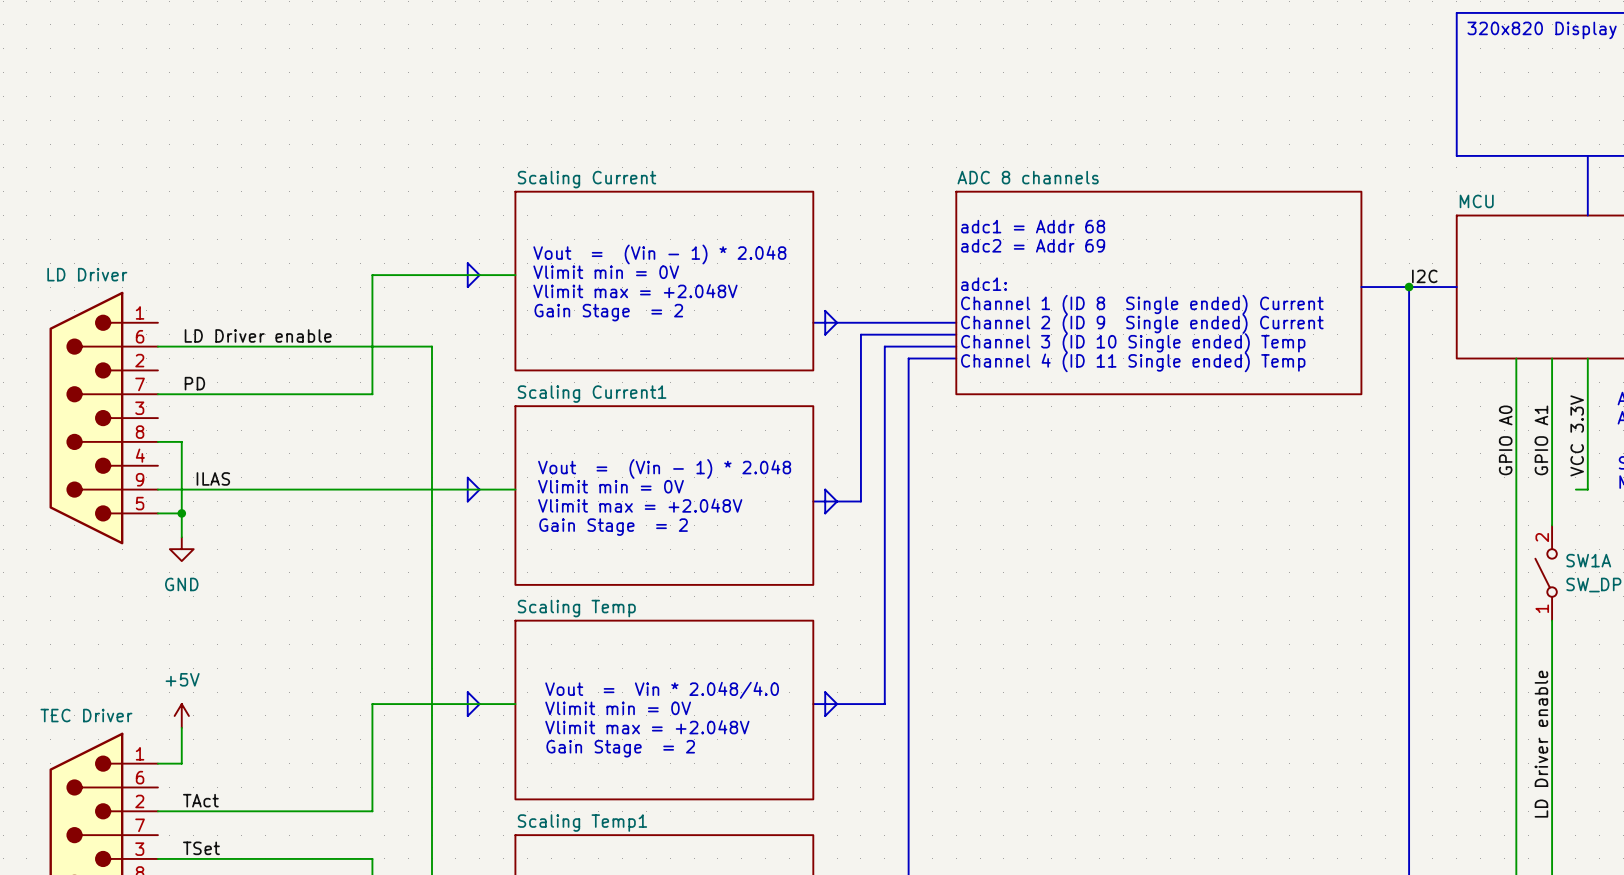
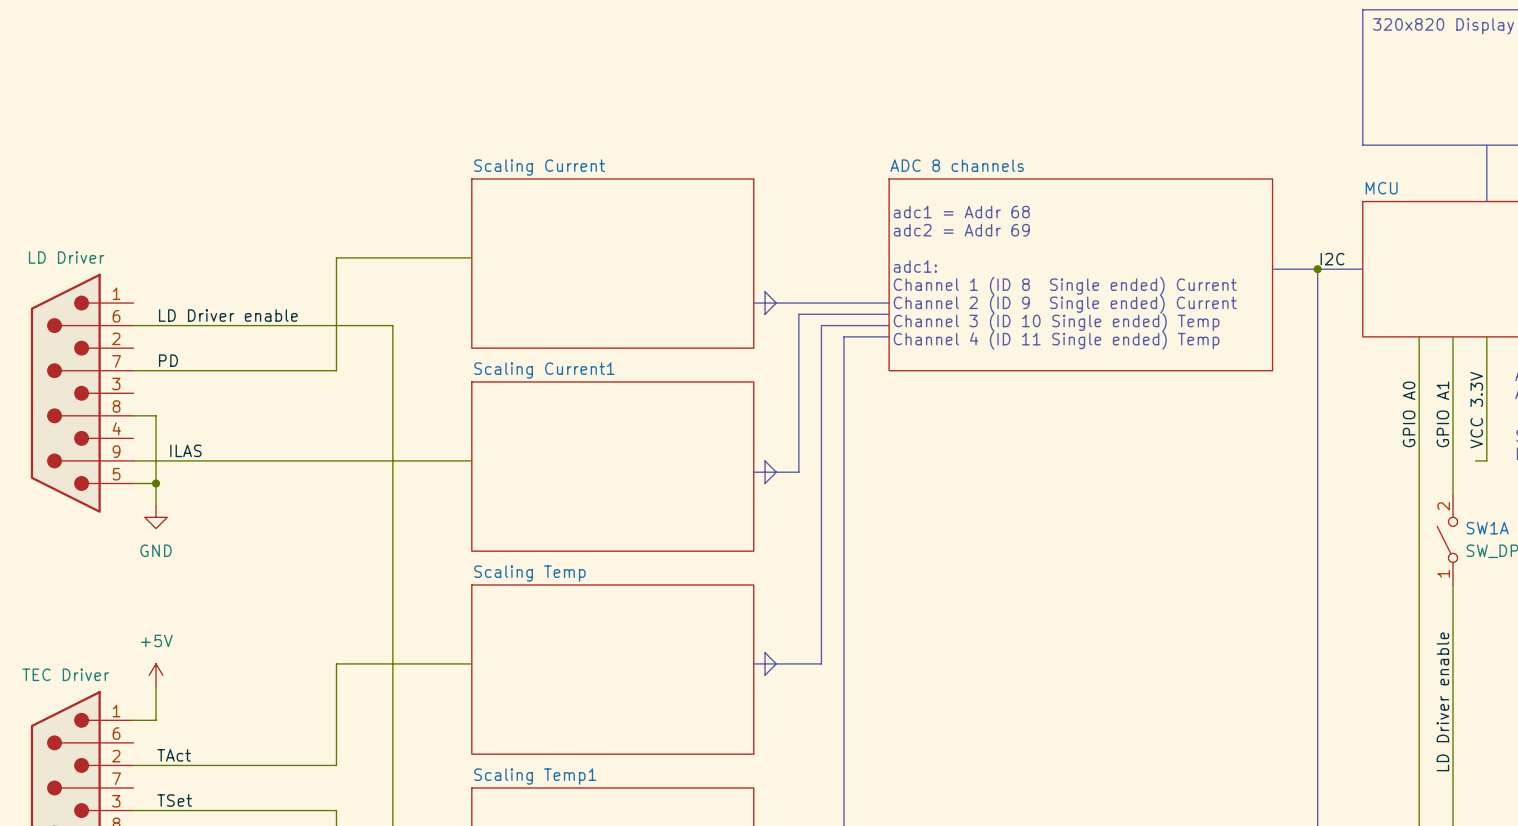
text: Vout = (Vin - 1) * 2.048 (659, 254) -> none
line: (467, 263) (467, 287) (479, 275) (467, 263) -> none
text: Vlimit min = 0V (606, 272) -> none
text: Vlimit max = +2.048V (635, 291) -> none
text: Gain Stage = 2 (608, 312) -> none
text: Vout = (Vin - 1) * 2.048 (664, 468) -> none
line: (467, 477) (467, 501) (479, 489) (467, 477) -> none
text: Vlimit min = 0V (610, 486) -> none
text: Vlimit max = +2.048V (640, 505) -> none
text: Gain Stage = 2 (613, 527) -> none
text: Vout = Vin * 2.048/4.0 (662, 690) -> none
line: (467, 692) (467, 715) (479, 704) (467, 692) -> none
text: Vlimit min = 0V (618, 708) -> none
text: Vlimit max = +2.048V (647, 727) -> none
text: Gain Stage = 2 (620, 748) -> none

